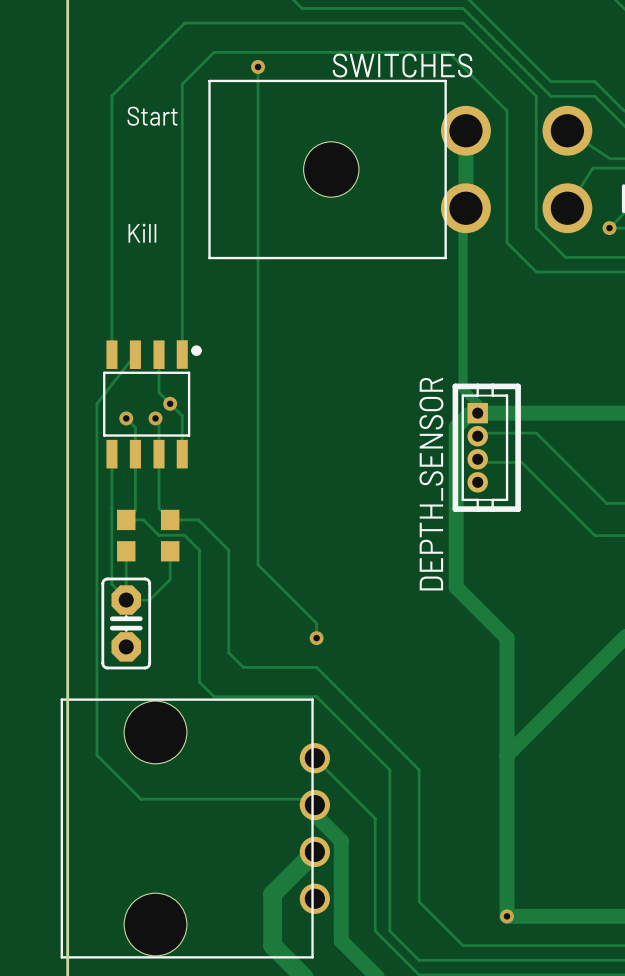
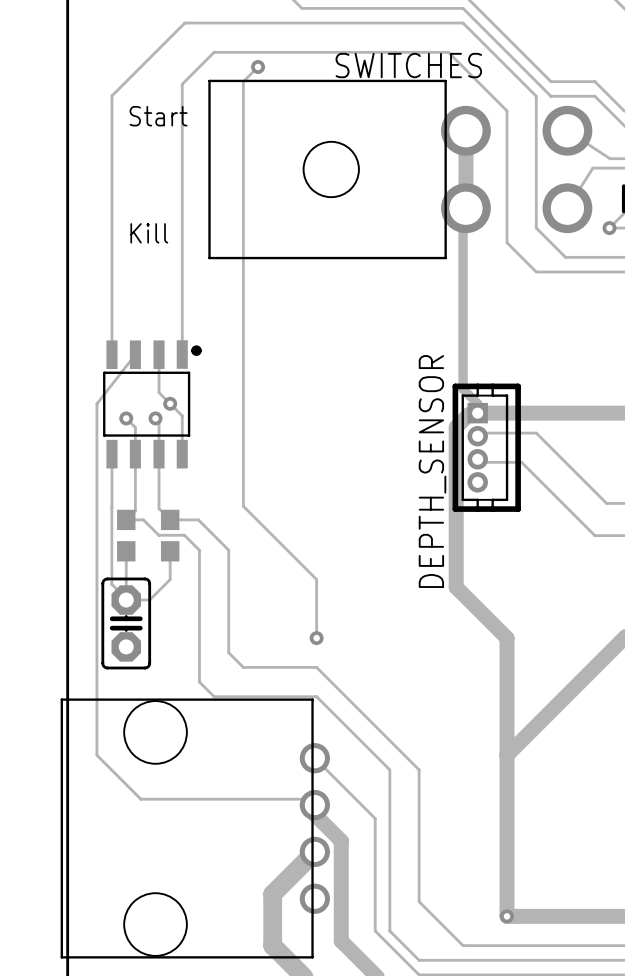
track: (258, 66) (258, 564) (316, 623) -> (258, 66) (243, 81) (243, 506) (316, 579) (316, 623)

